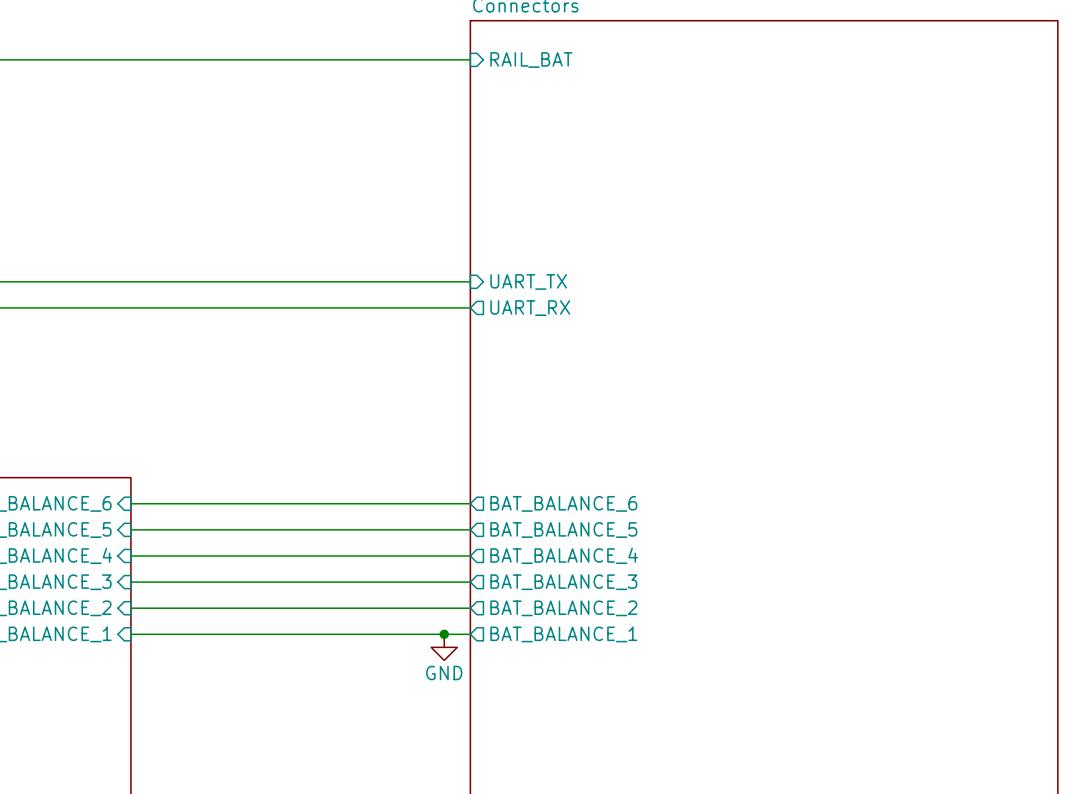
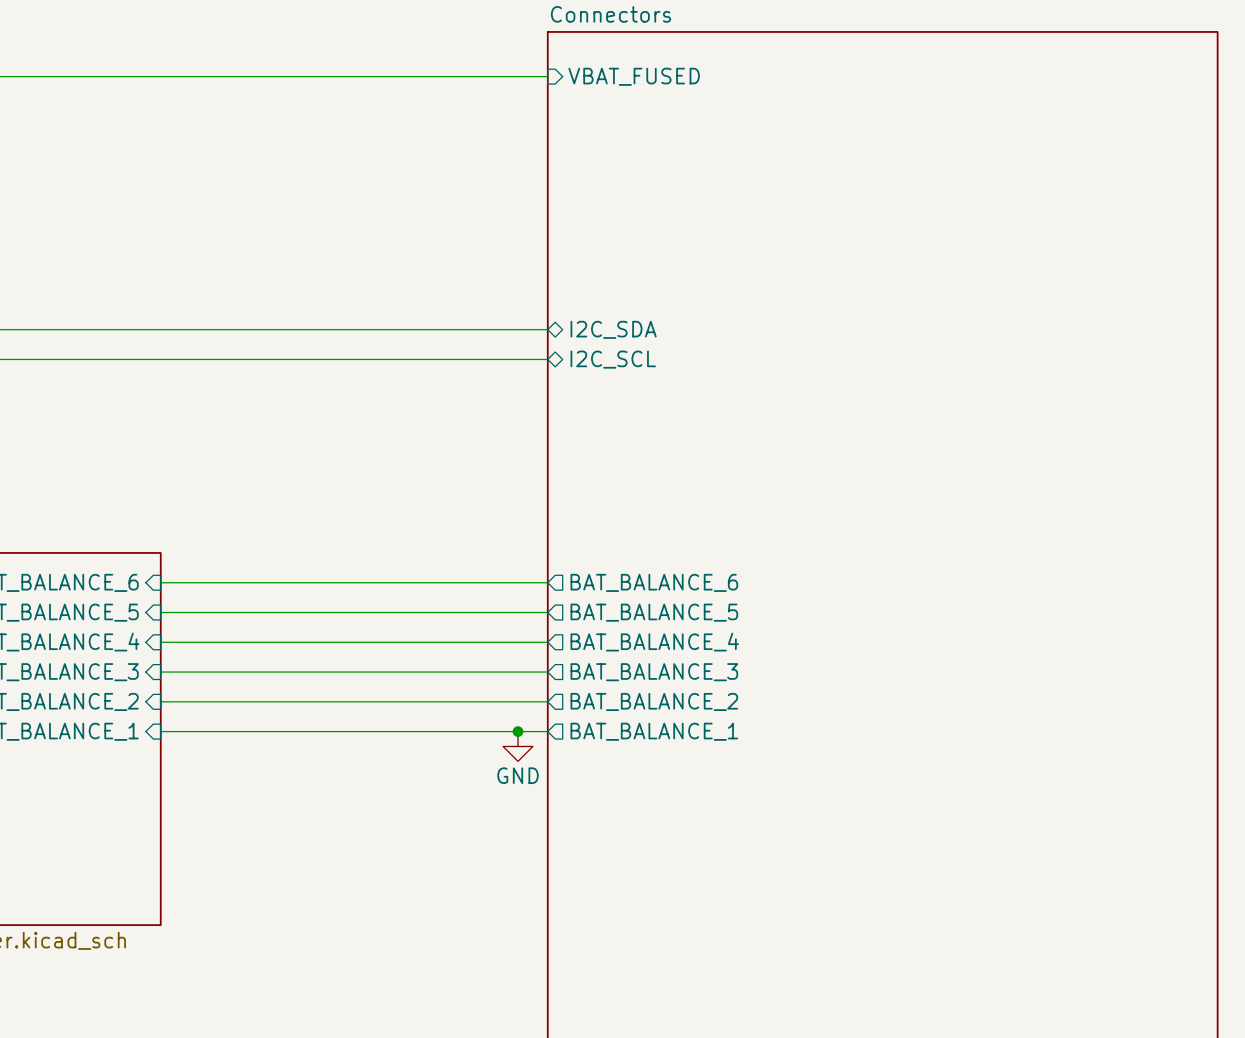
sheet pin: RAIL_BAT (531, 60) -> VBAT_FUSED (634, 76)
sheet pin shape: input (528, 281) -> bidirectional (613, 329)
sheet pin: UART_TX (528, 281) -> I2C_SDA (613, 329)
sheet pin shape: output (530, 308) -> bidirectional (613, 359)
sheet pin: UART_RX (530, 308) -> I2C_SCL (613, 359)

